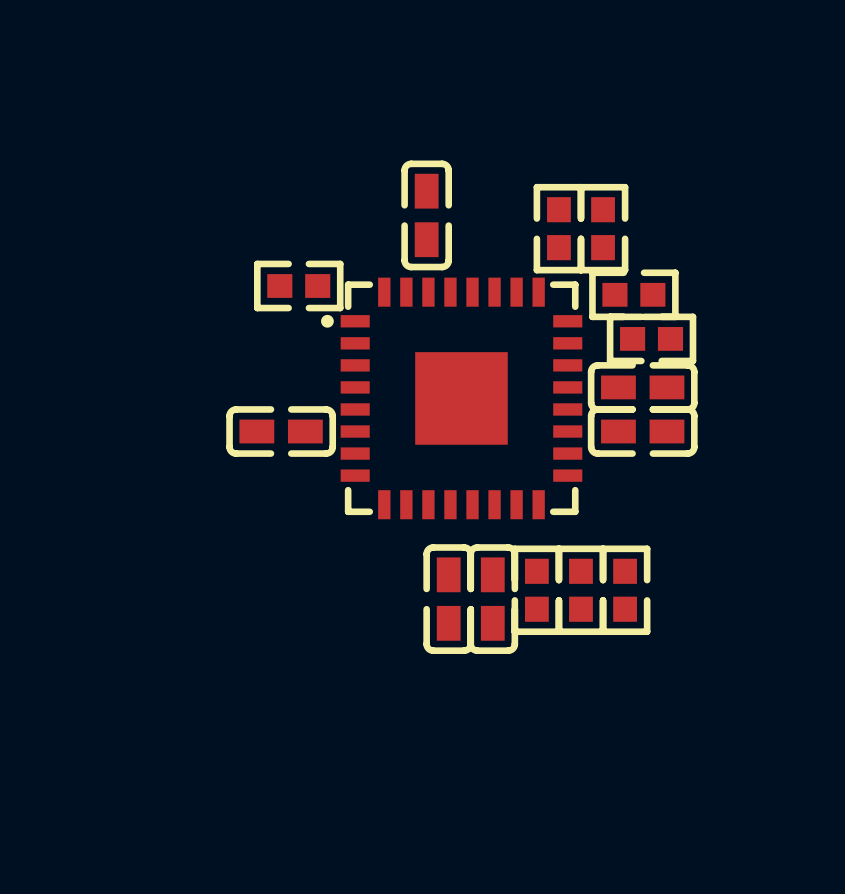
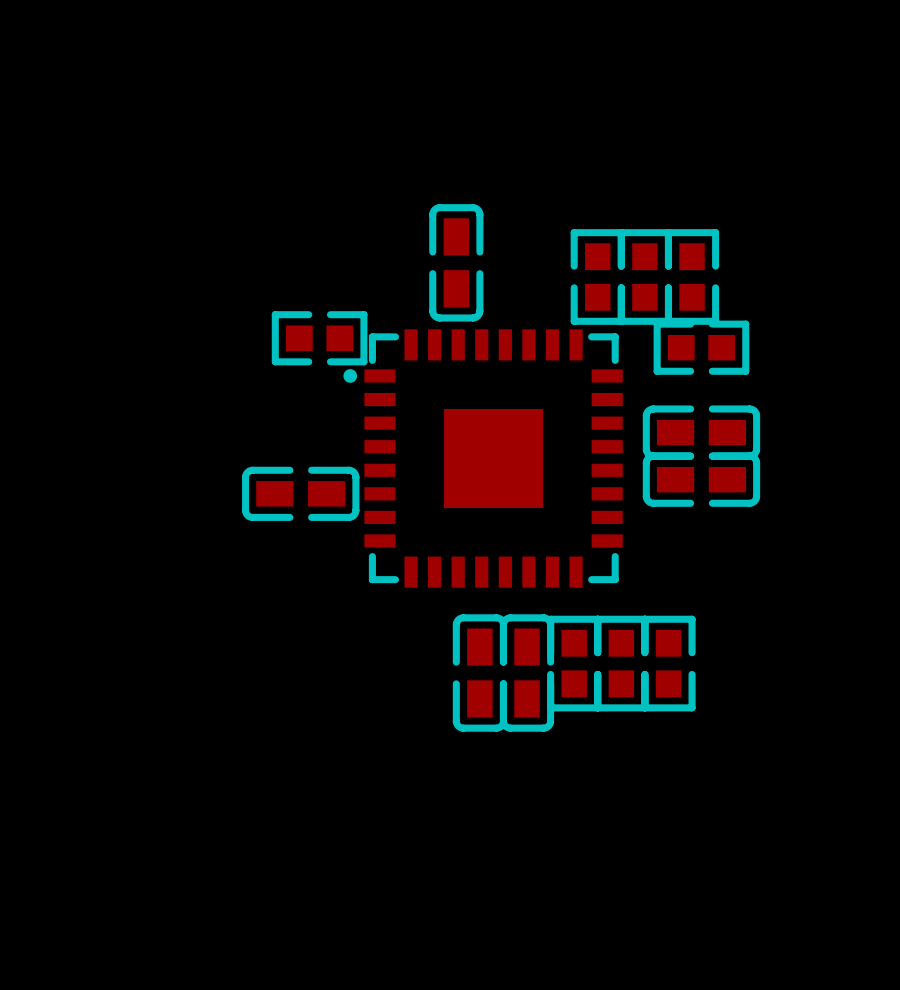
part: none -> (692, 276)
part: (633, 294) -> none
part: none -> (701, 347)
part: (651, 338) -> none
part: none -> (701, 432)
part: (642, 387) -> none
part: none -> (701, 479)
part: (642, 431) -> none

